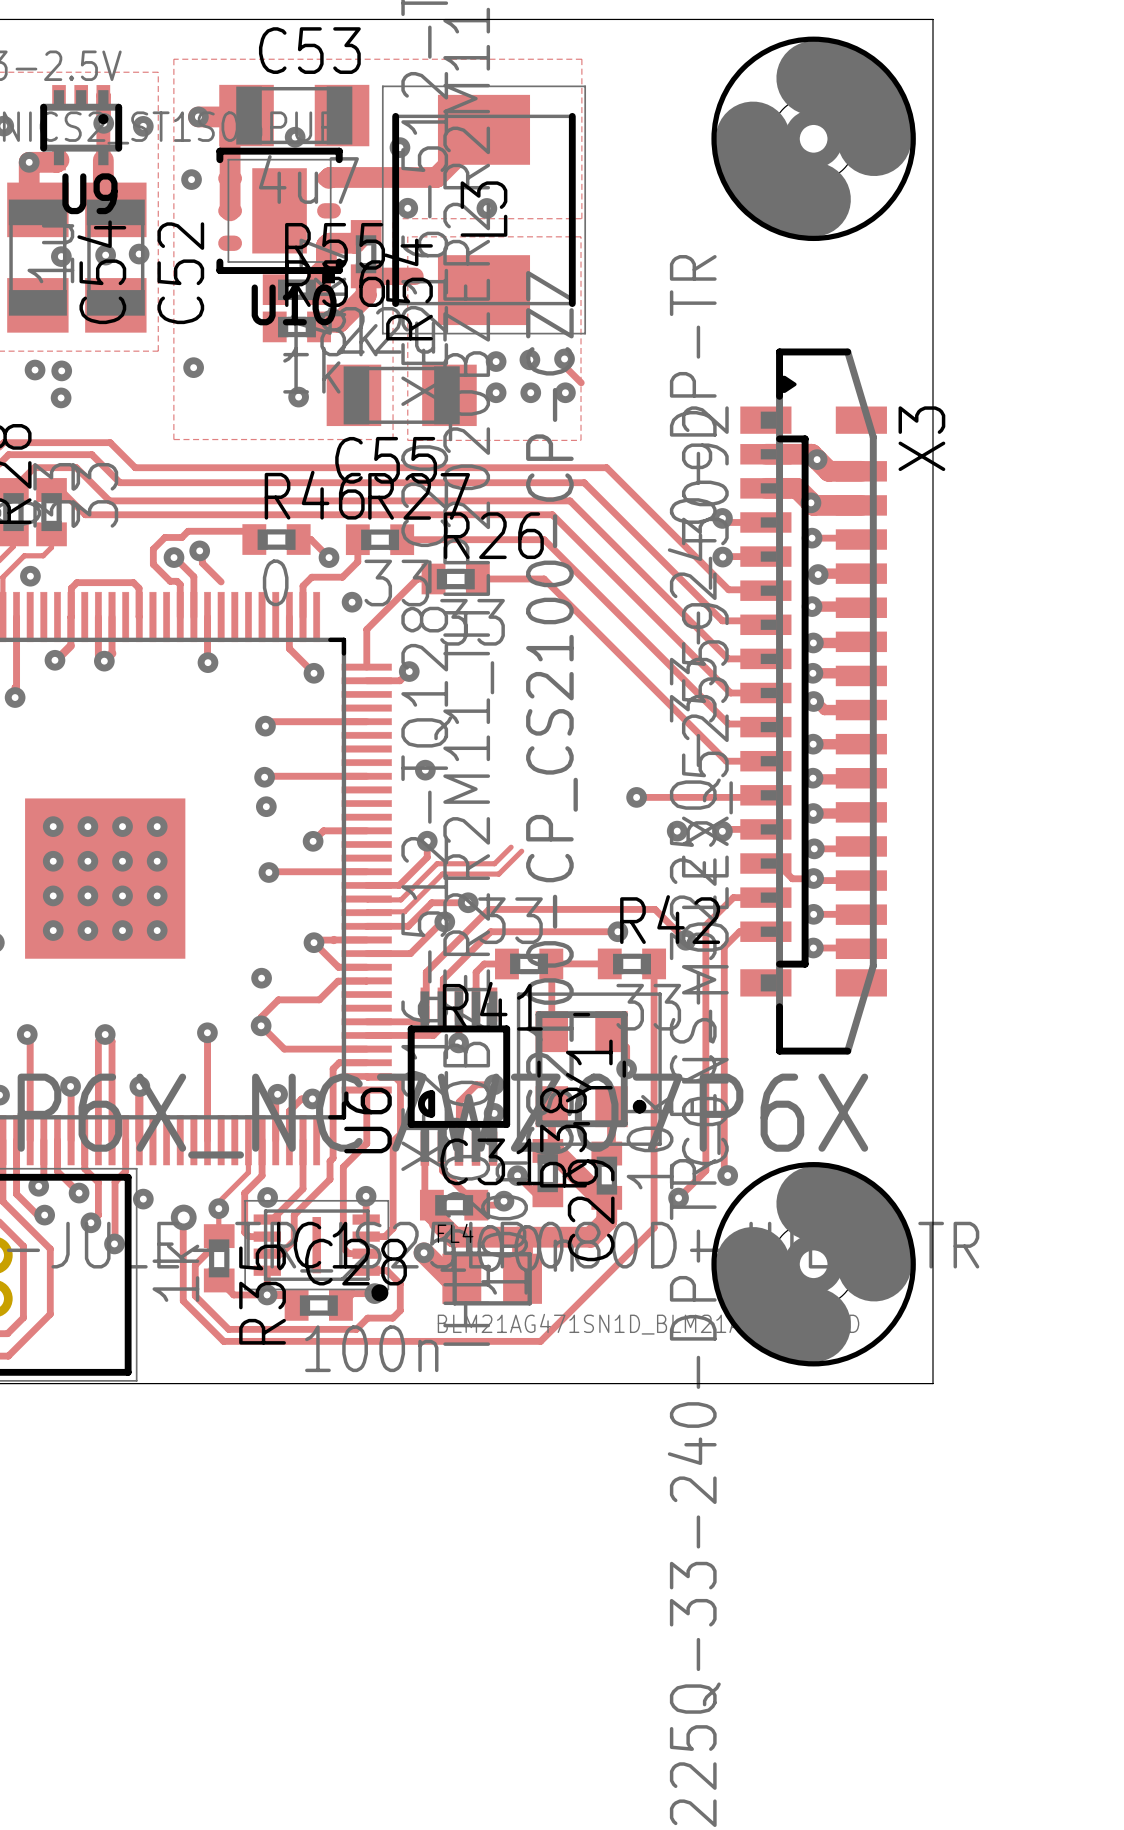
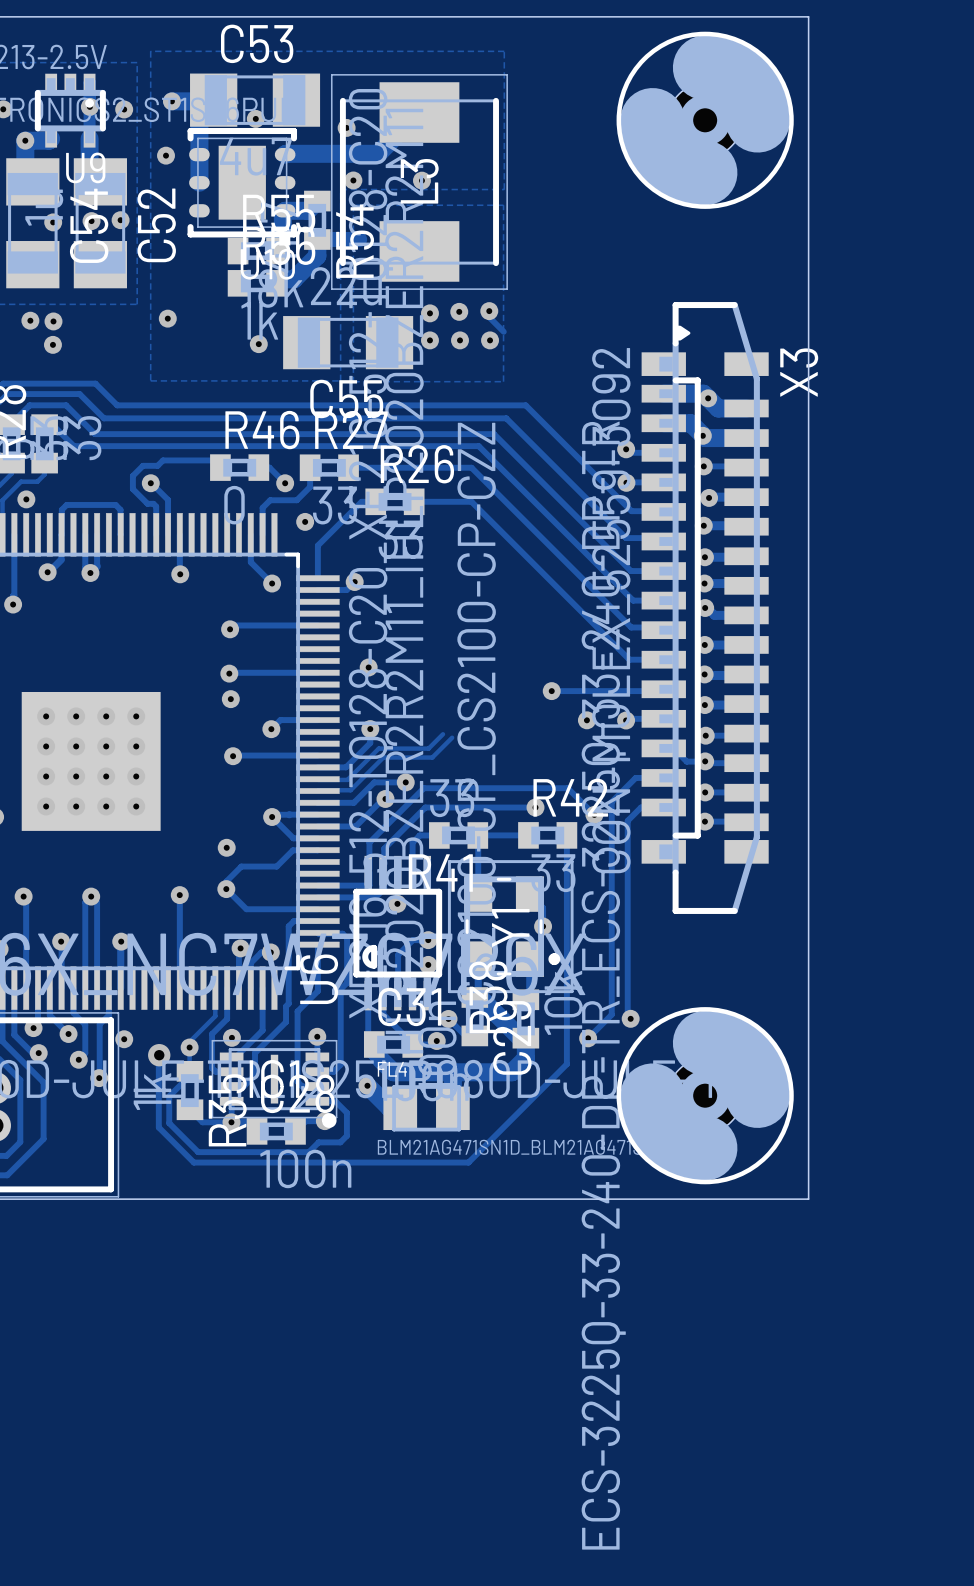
track: (199, 550) (202, 553) (202, 563) (221, 581) -> none
via: (199, 550) -> none

